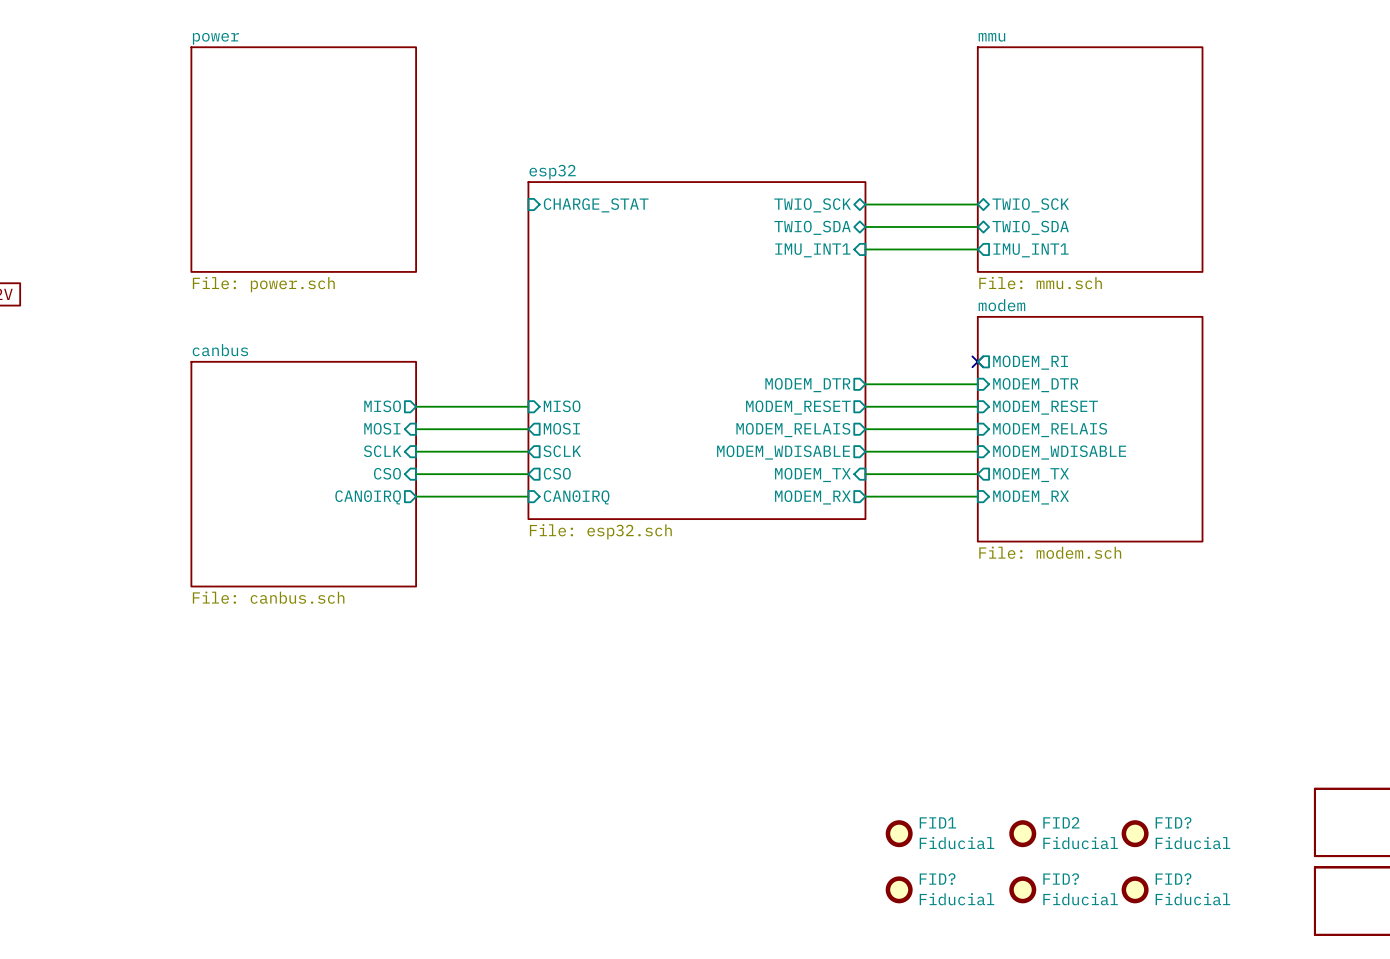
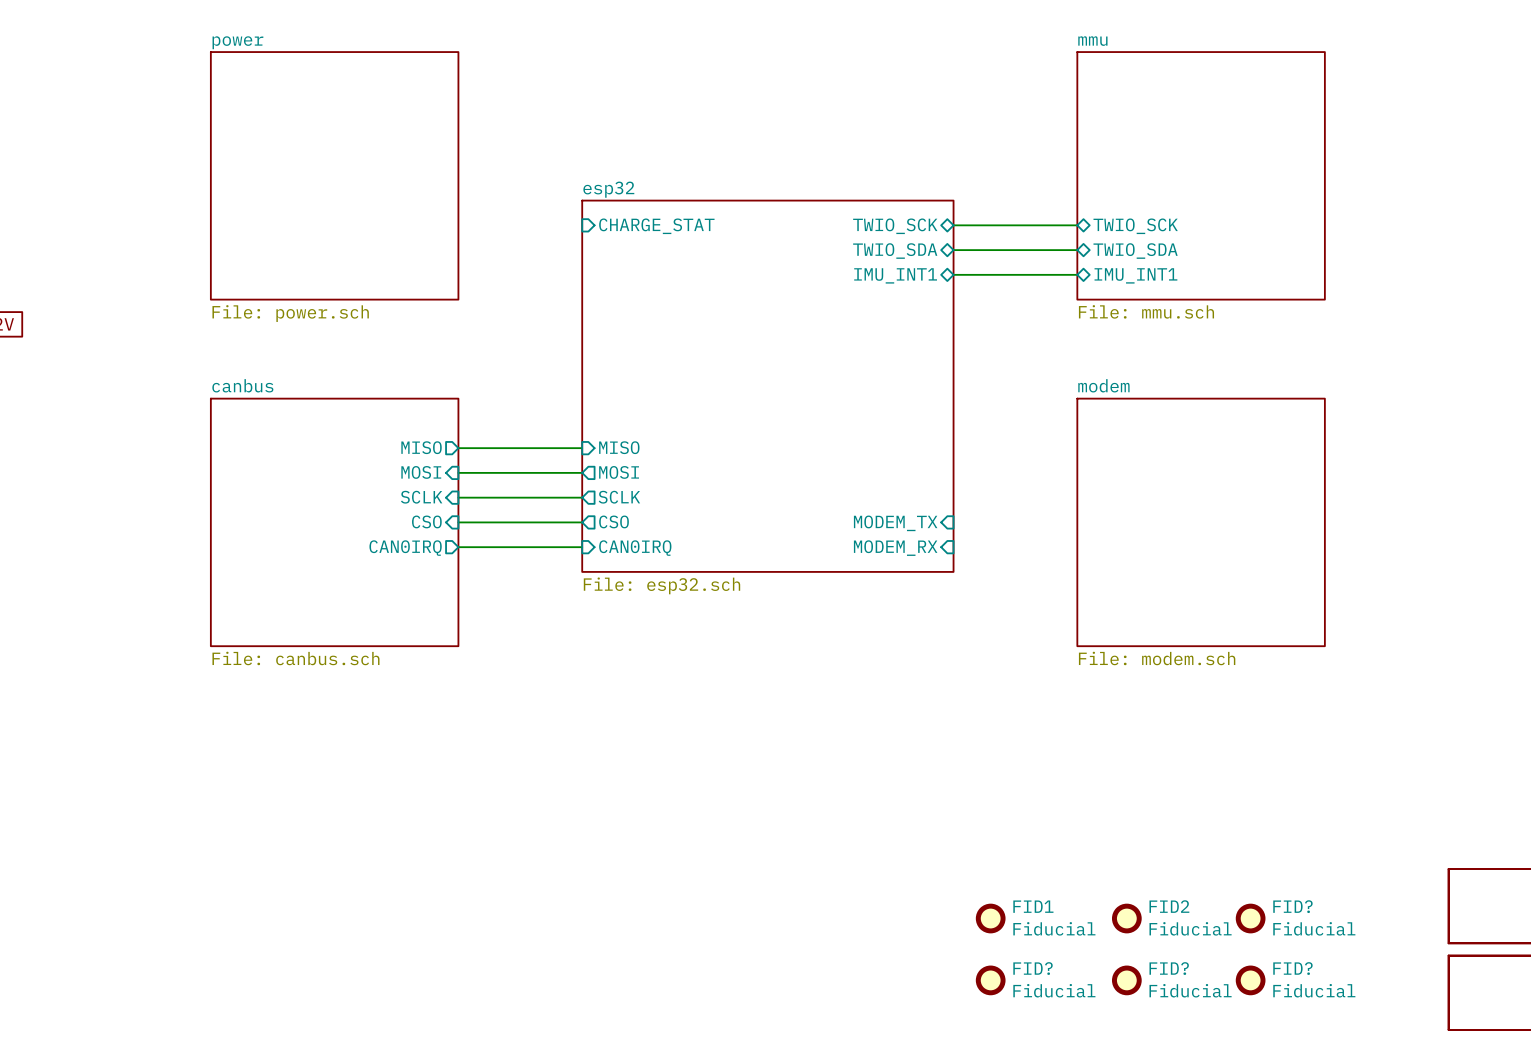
sheet pin shape: input (812, 250) -> bidirectional (895, 275)
sheet pin shape: output (1031, 250) -> bidirectional (1135, 275)
no-connect mark: (977, 361) -> none
sheet pin: MODEM_RI (1030, 362) -> none
wire: (865, 384) (977, 384) -> none
sheet pin: MODEM_DTR (807, 385) -> none
sheet pin: MODEM_DTR (1035, 385) -> none
wire: (865, 406) (977, 406) -> none
sheet pin: MODEM_RESET (798, 407) -> none
sheet pin: MODEM_RESET (1045, 407) -> none
wire: (865, 429) (977, 429) -> none
sheet modem position: (1090, 429) -> (1201, 522)
sheet pin: MODEM_RELAIS (793, 430) -> none
sheet pin: MODEM_RELAIS (1050, 430) -> none
wire: (865, 451) (977, 451) -> none
sheet pin: MODEM_WDISABLE (783, 452) -> none
sheet pin: MODEM_WDISABLE (1059, 452) -> none
wire: (865, 474) (977, 474) -> none
sheet pin: MODEM_TX (1031, 475) -> none
wire: (865, 496) (977, 496) -> none
sheet pin shape: output (812, 497) -> input (895, 548)
sheet pin: MODEM_RX (1031, 497) -> none

